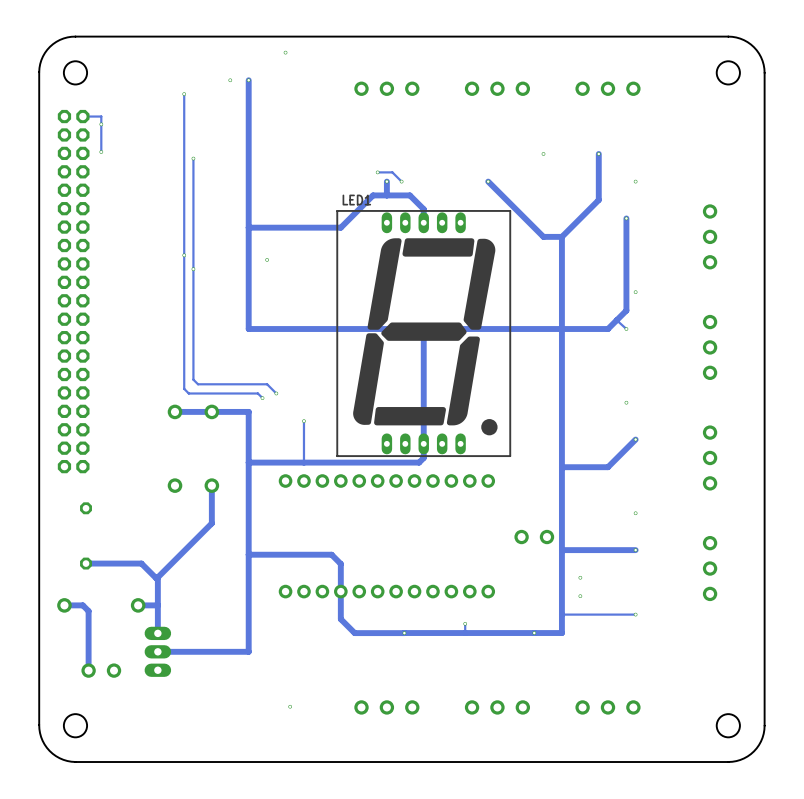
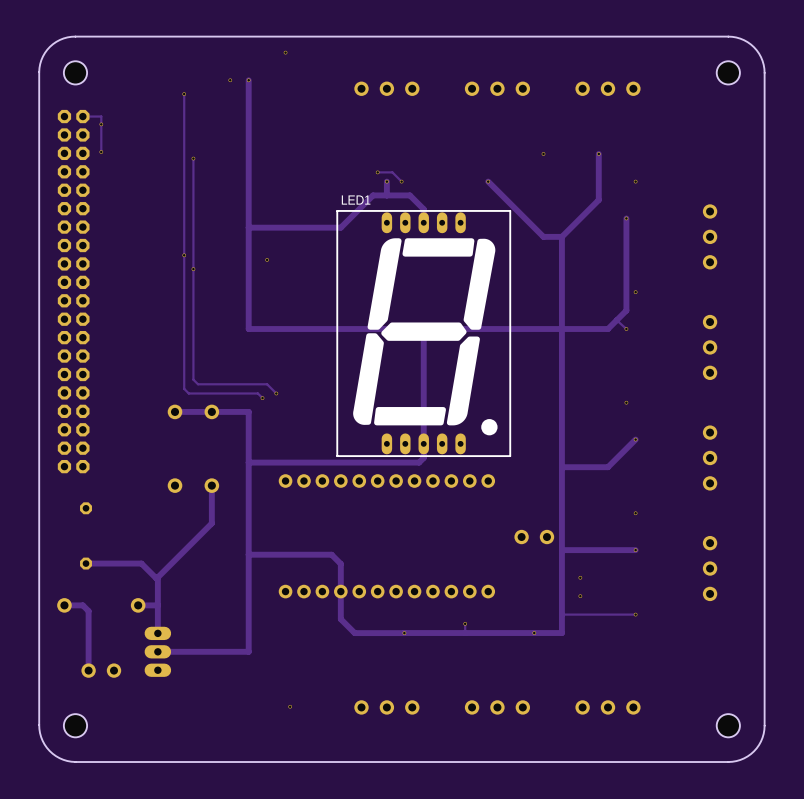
track: (303, 421) (303, 462) -> none
via: (303, 421) -> none

